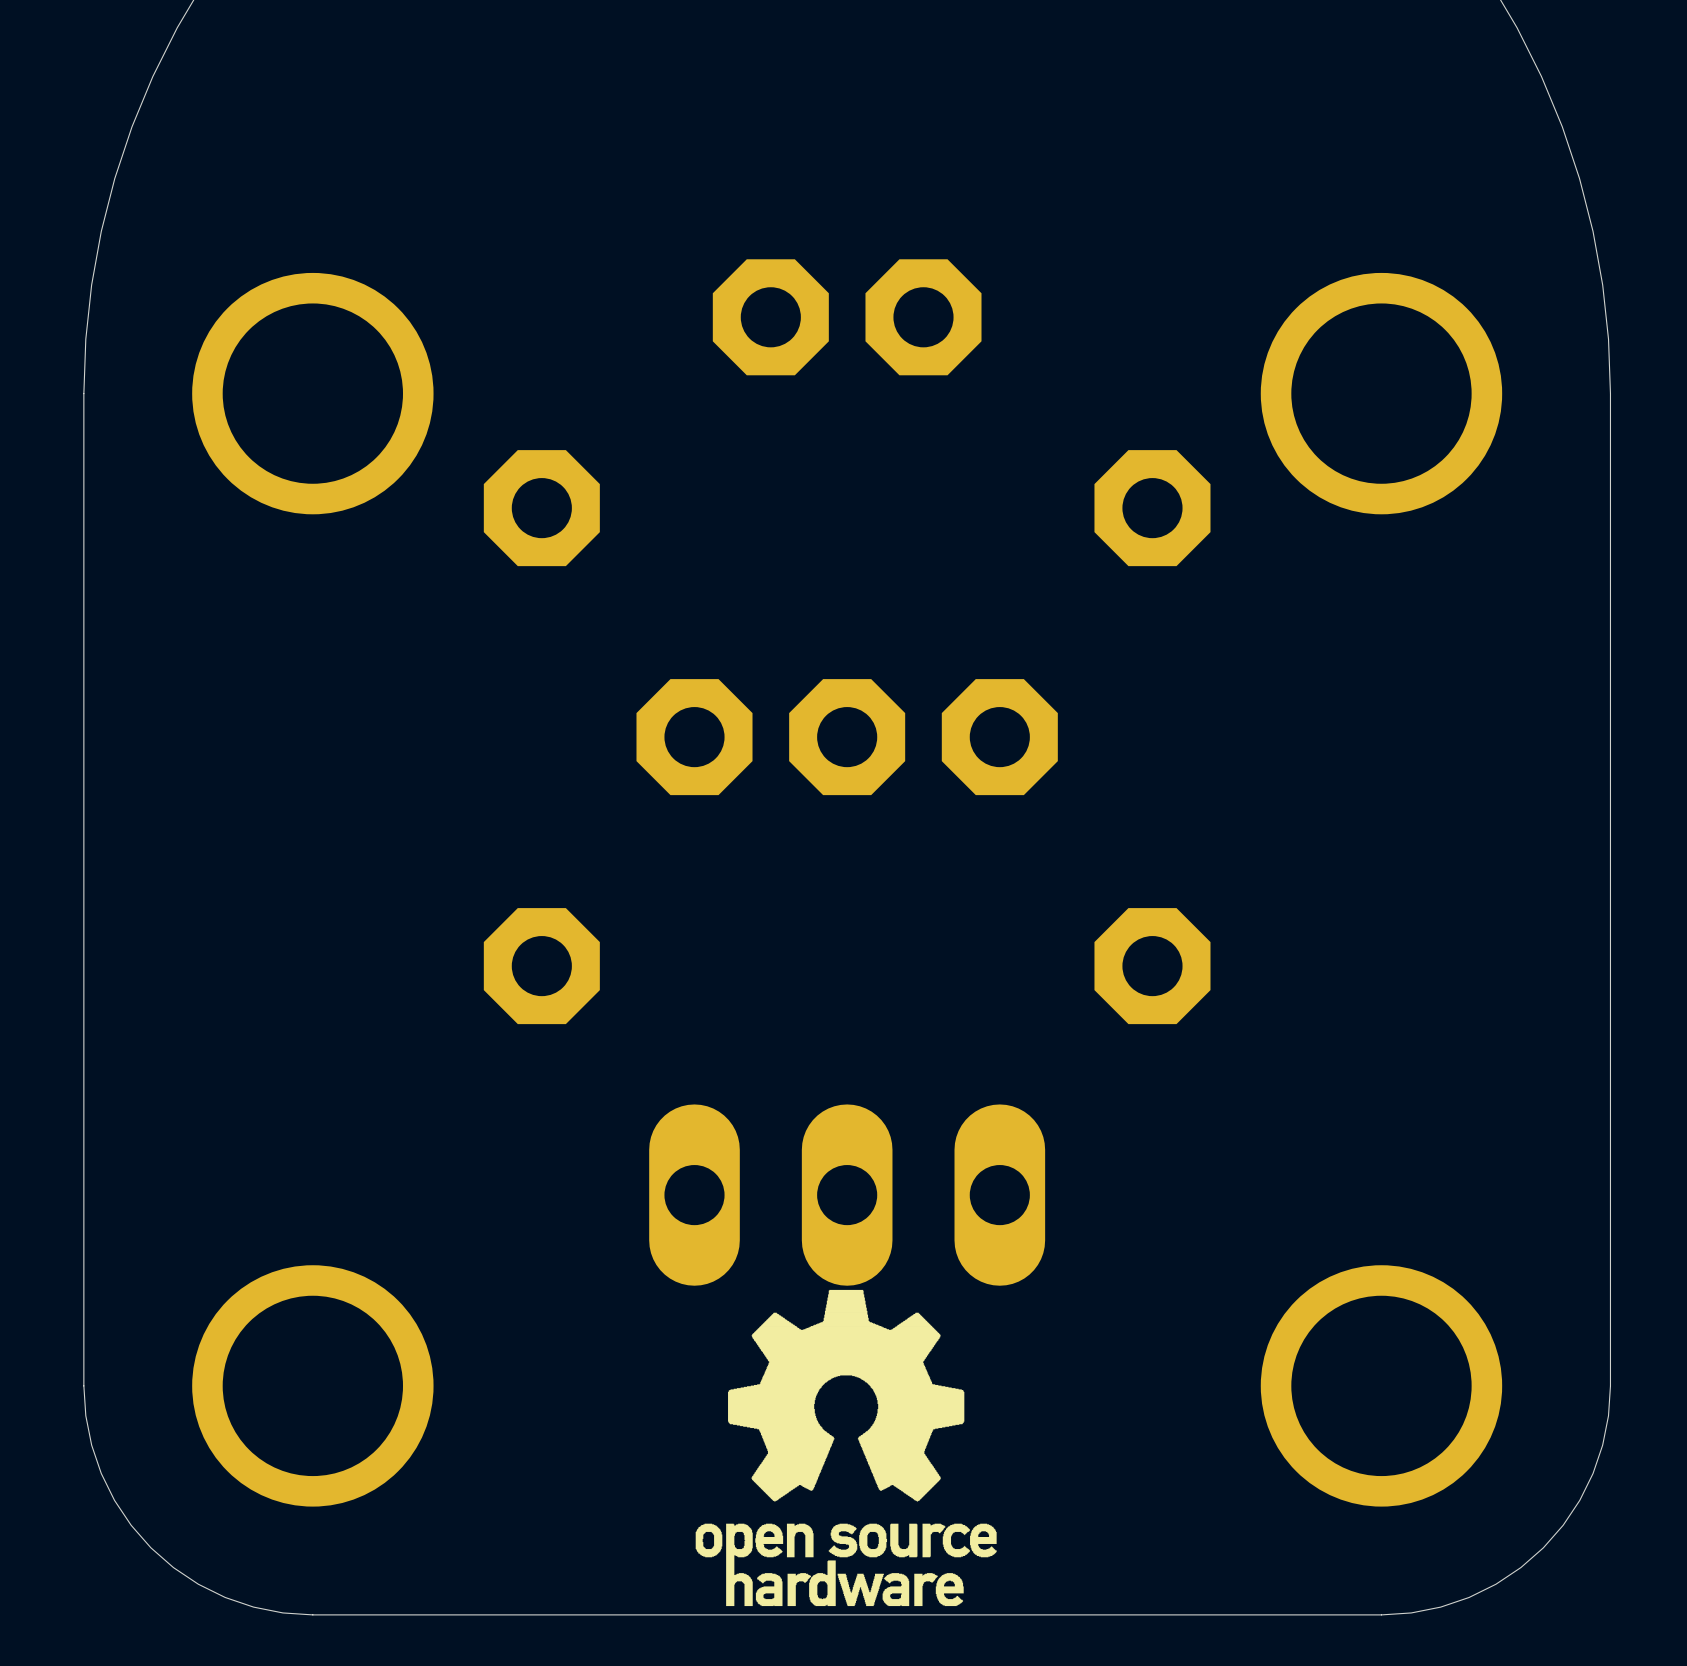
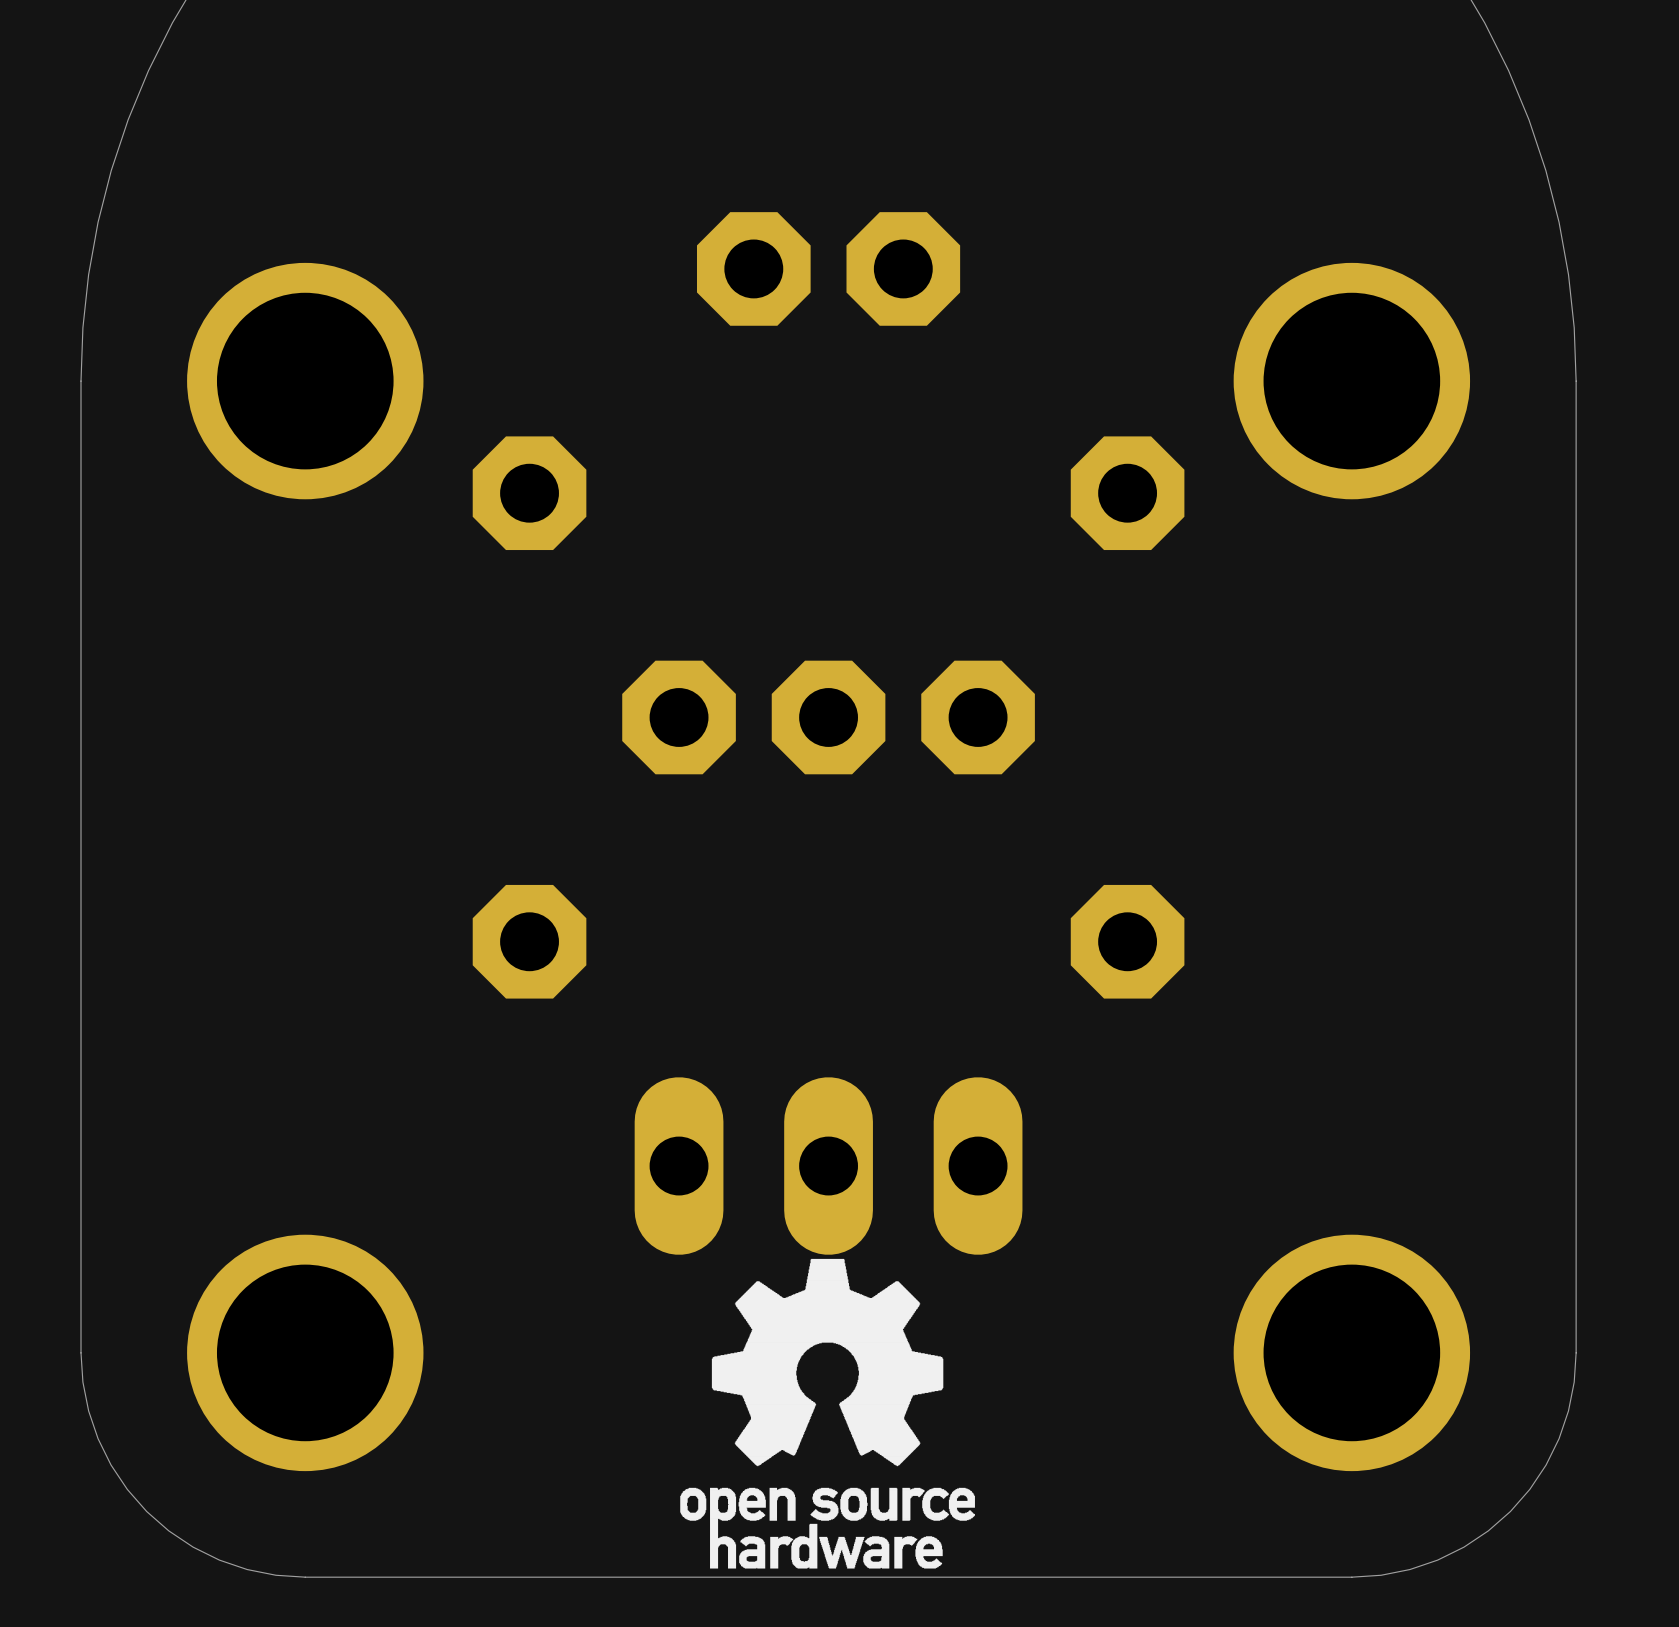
part position: (847, 317) -> (828, 268)

